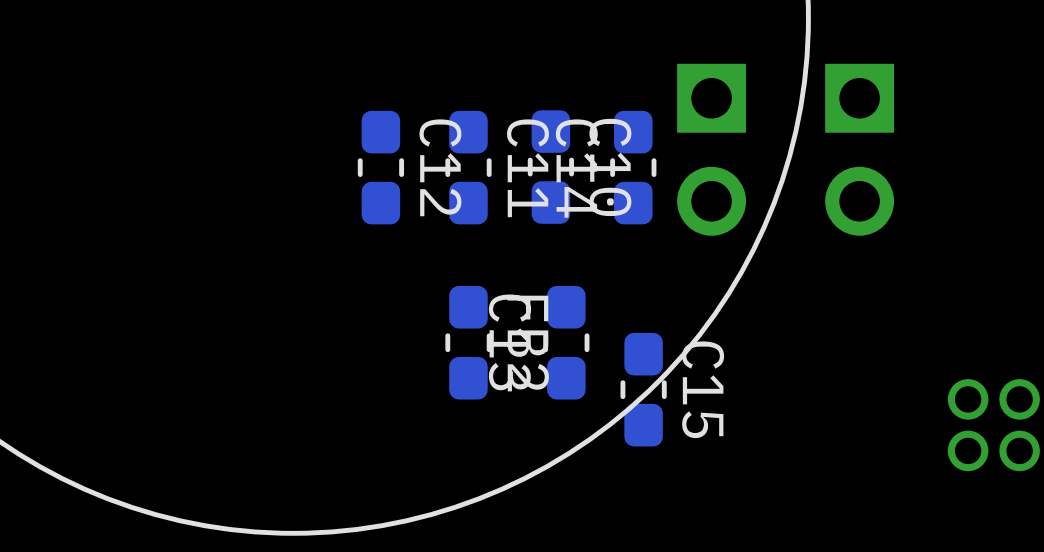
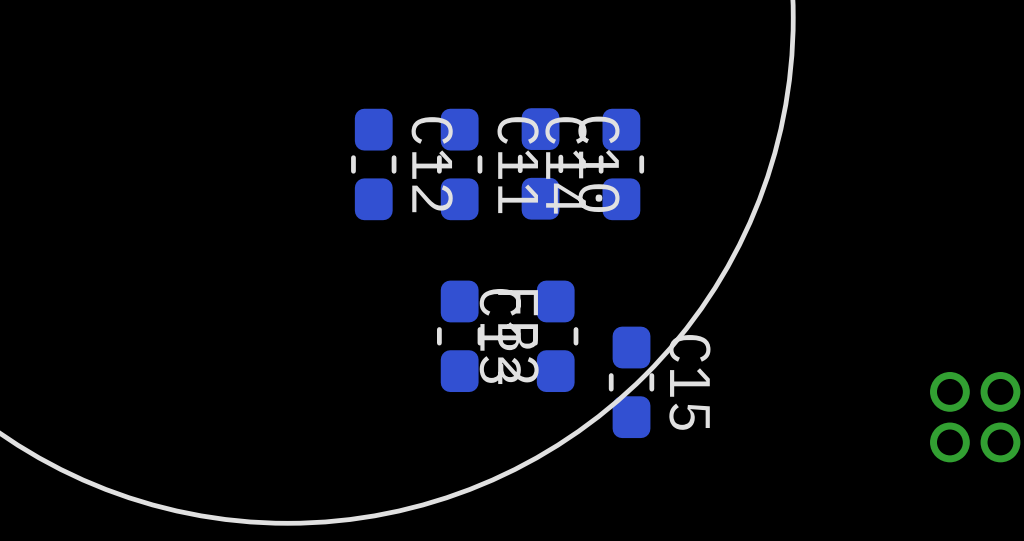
part: (711, 149) -> none
part: (859, 149) -> none

